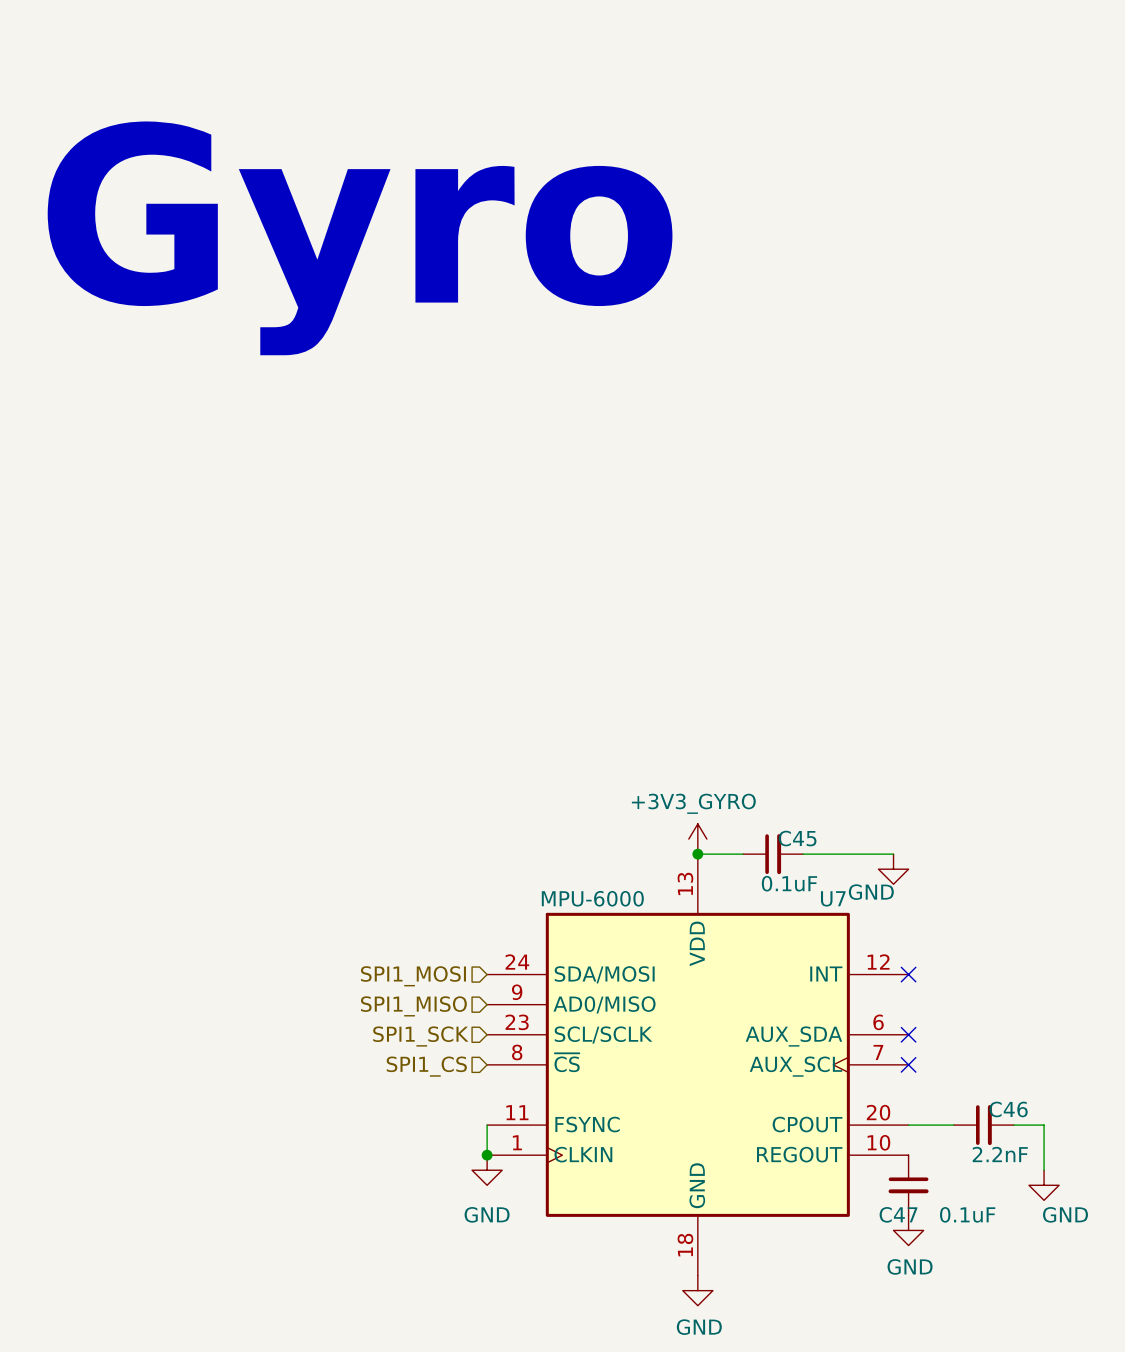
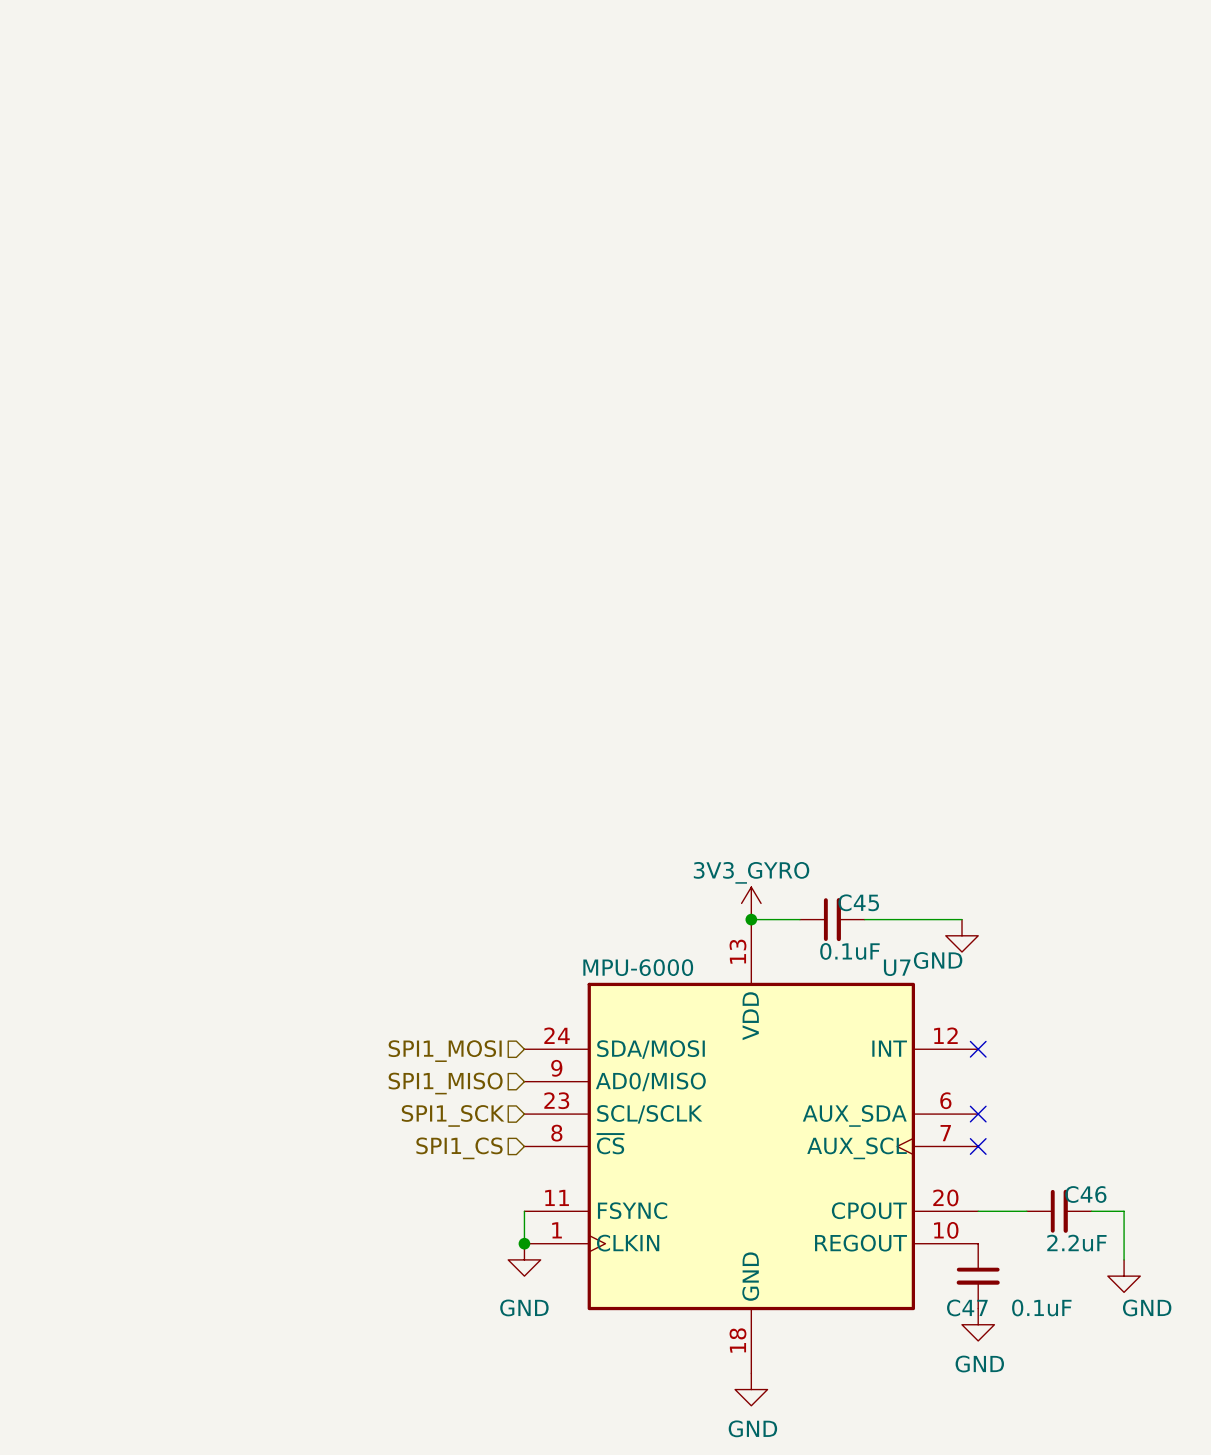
text: Gyro (360, 238) -> none
power symbol: +3V3_GYRO (697, 839) -> 3V3_GYRO (751, 903)
C46 value: 2.2nF (1000, 1154) -> 2.2uF (1076, 1243)

